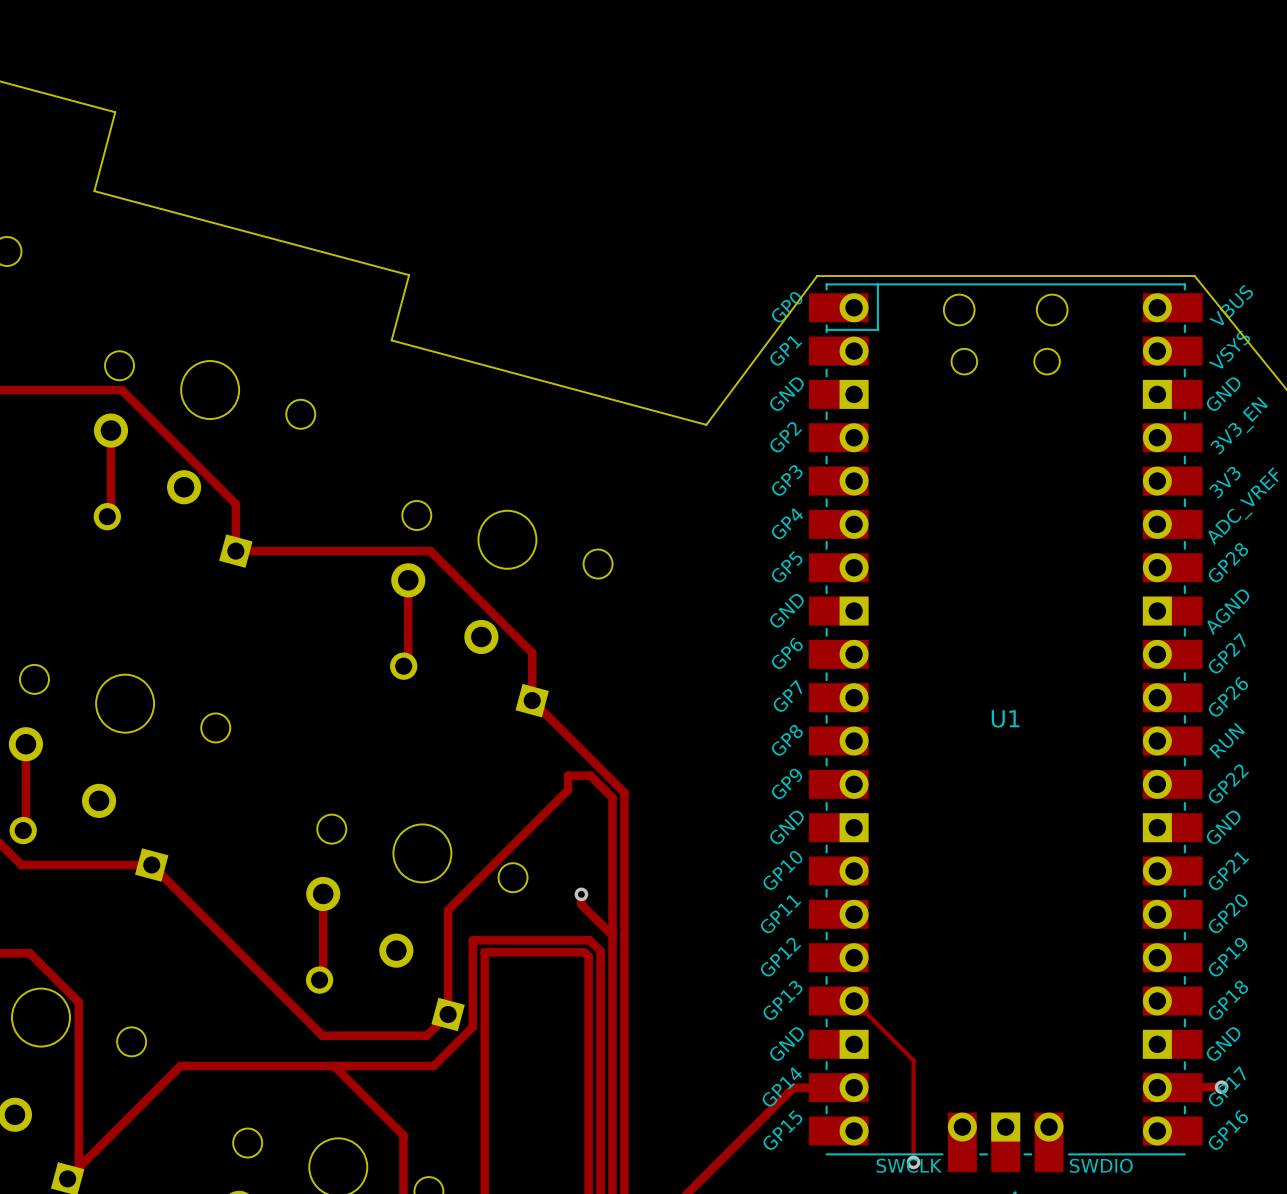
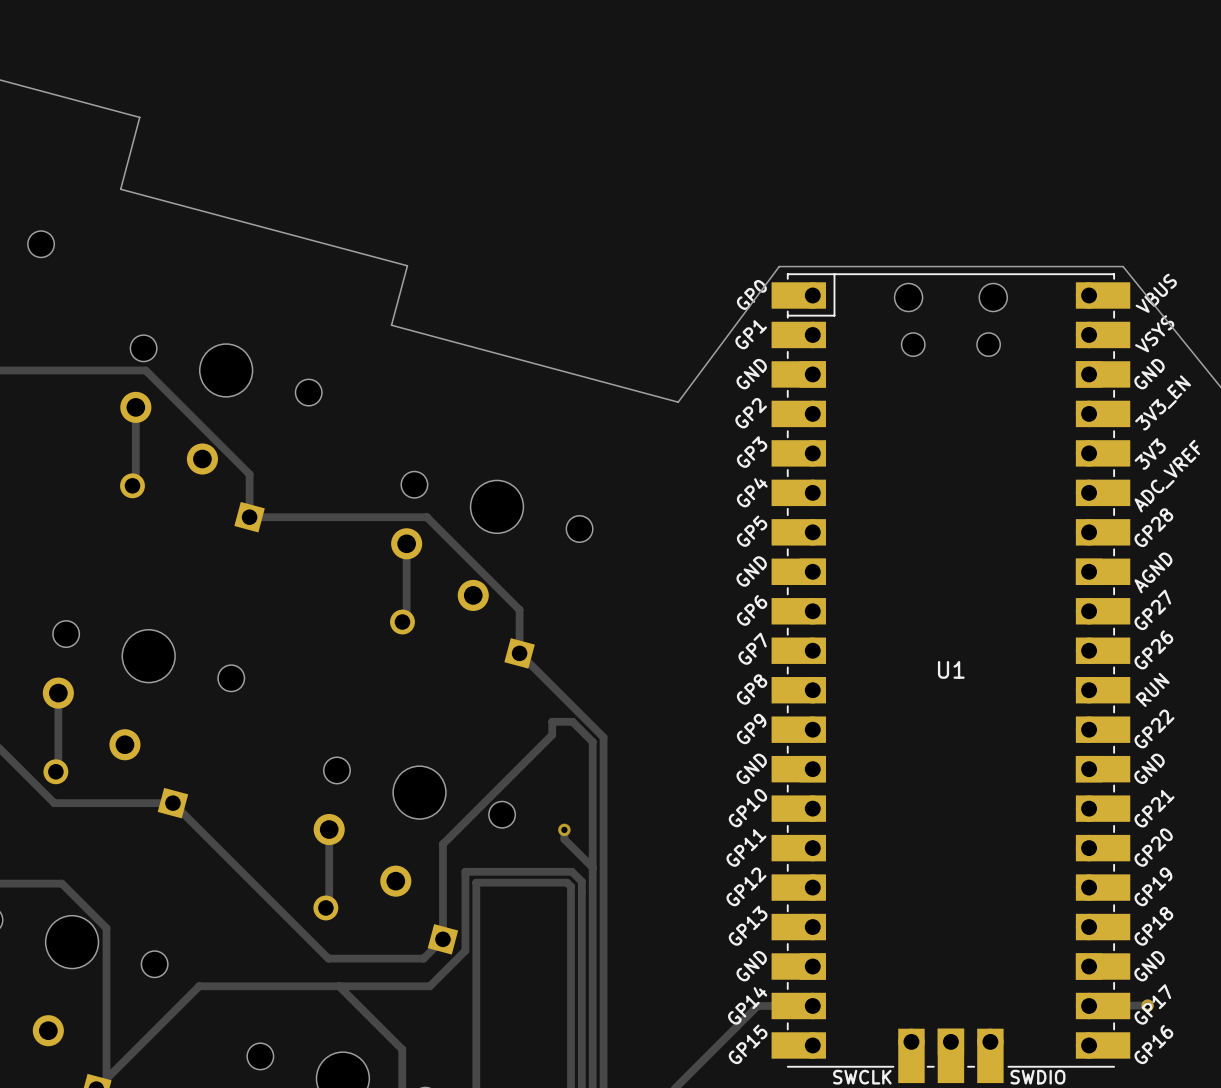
track: (854, 1001) (913, 1060) (913, 1162) -> none
via: (913, 1162) -> none

